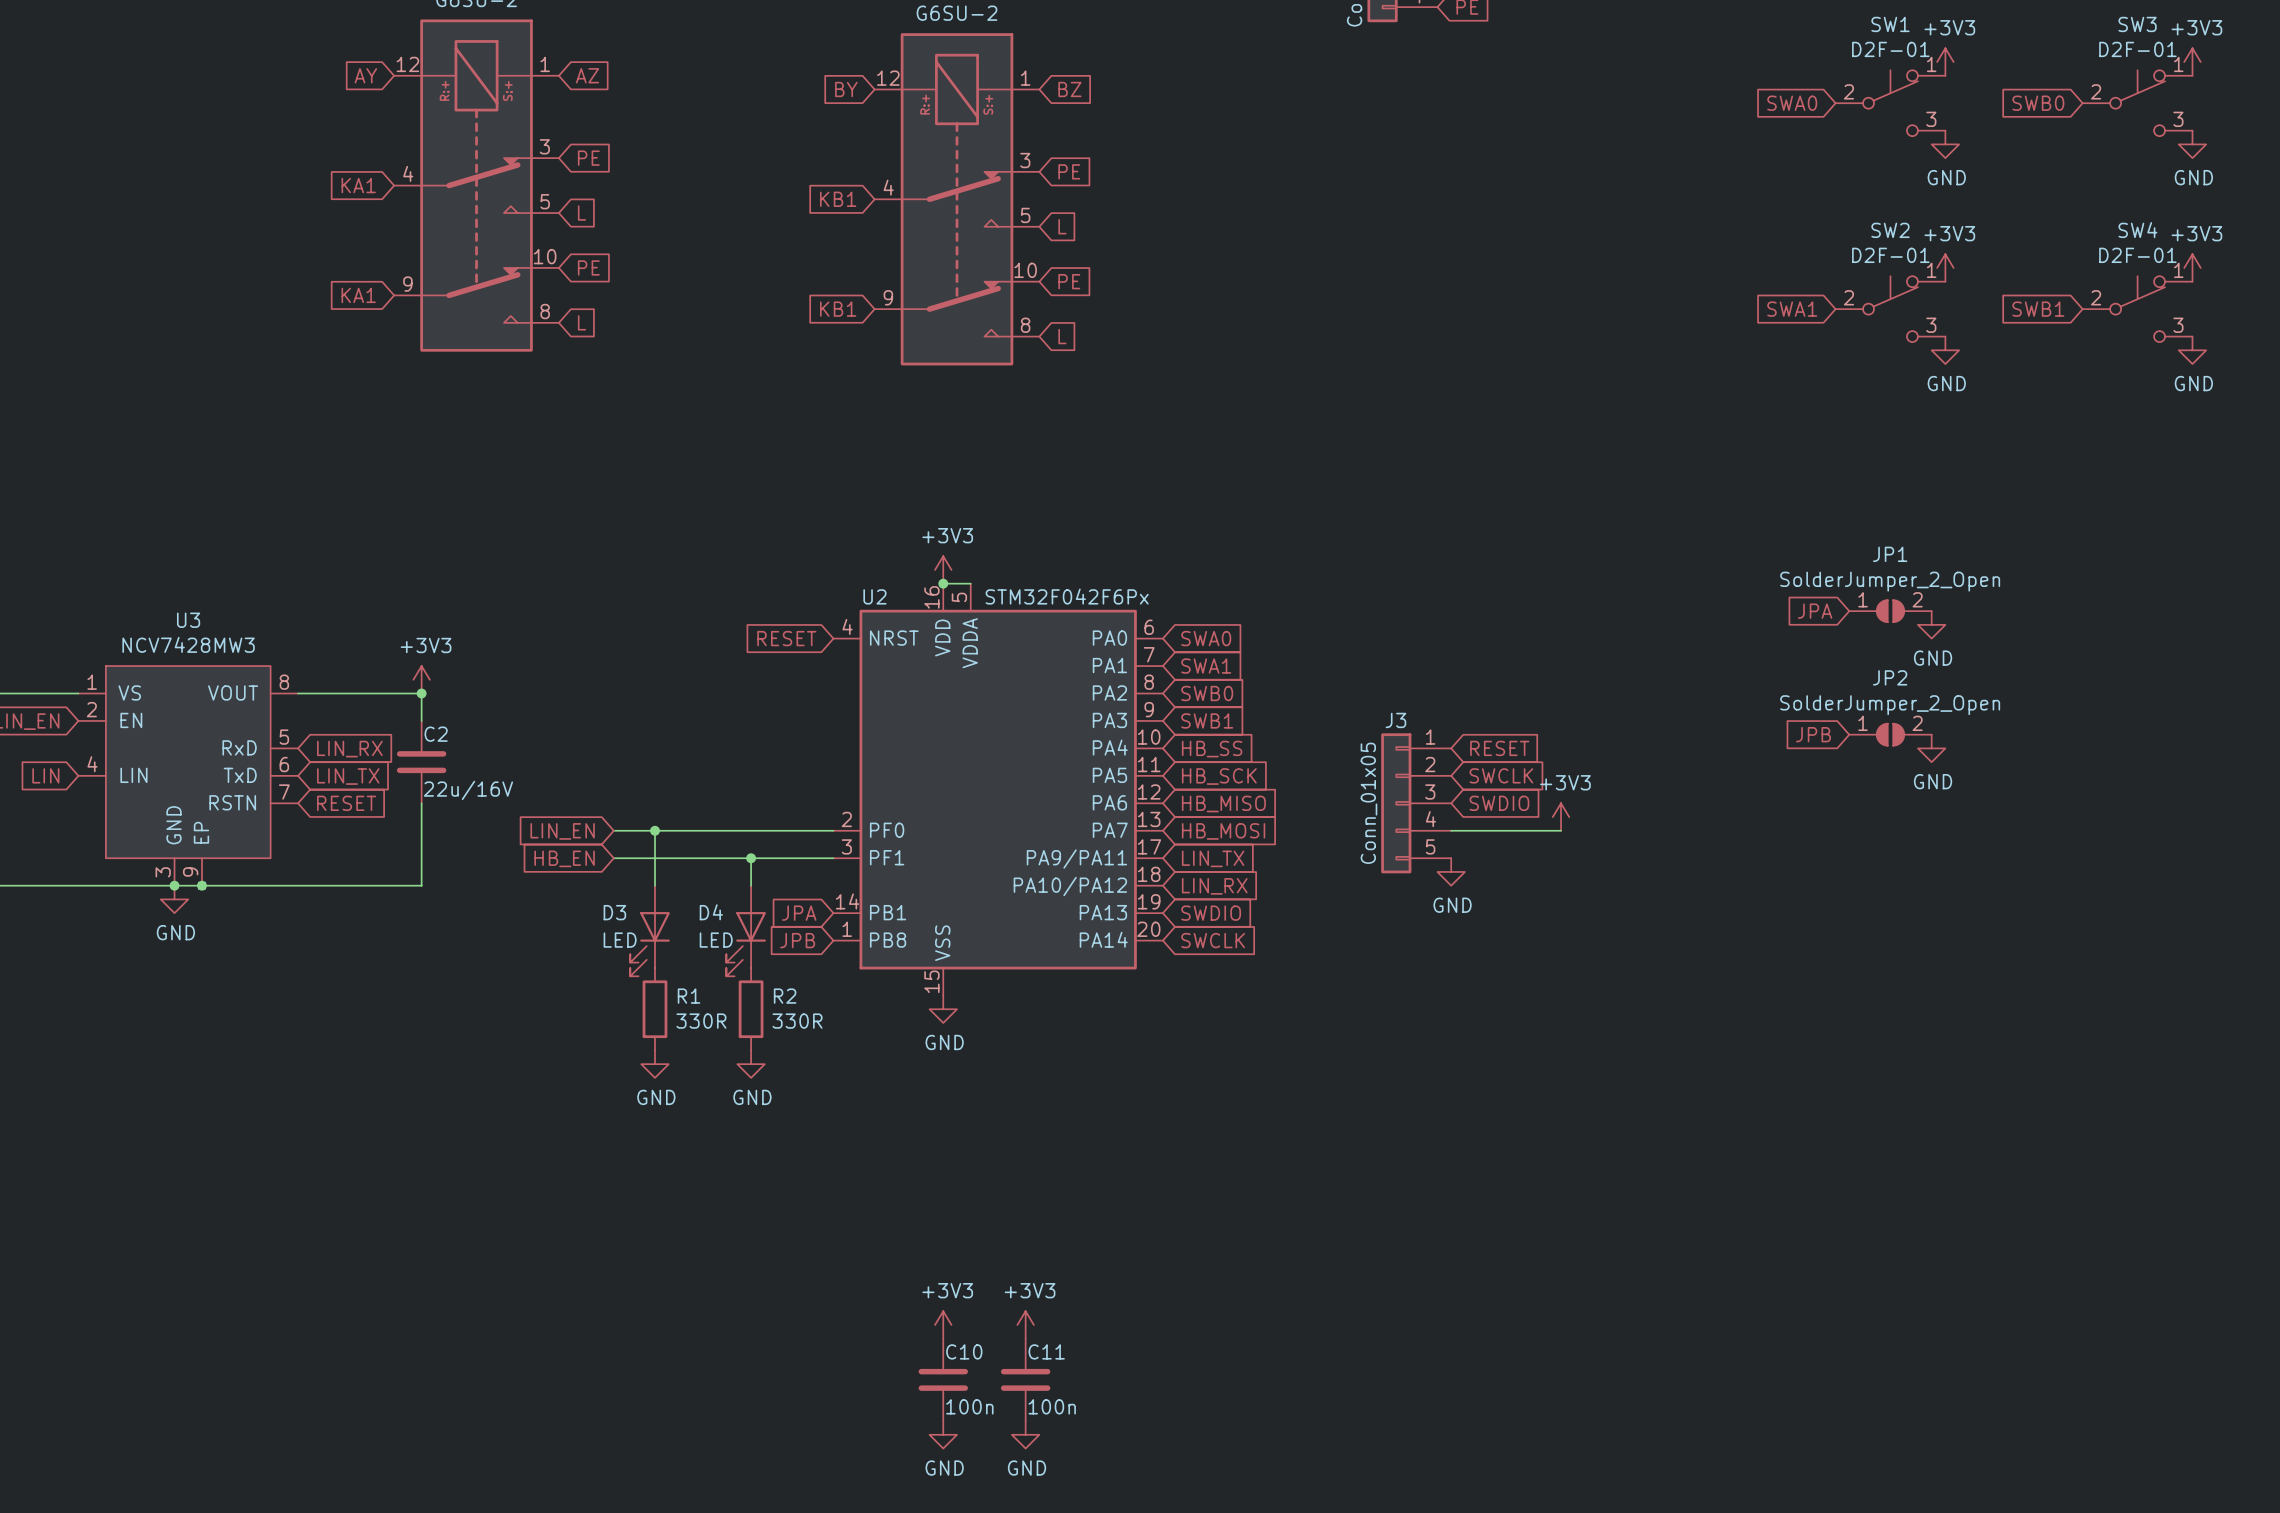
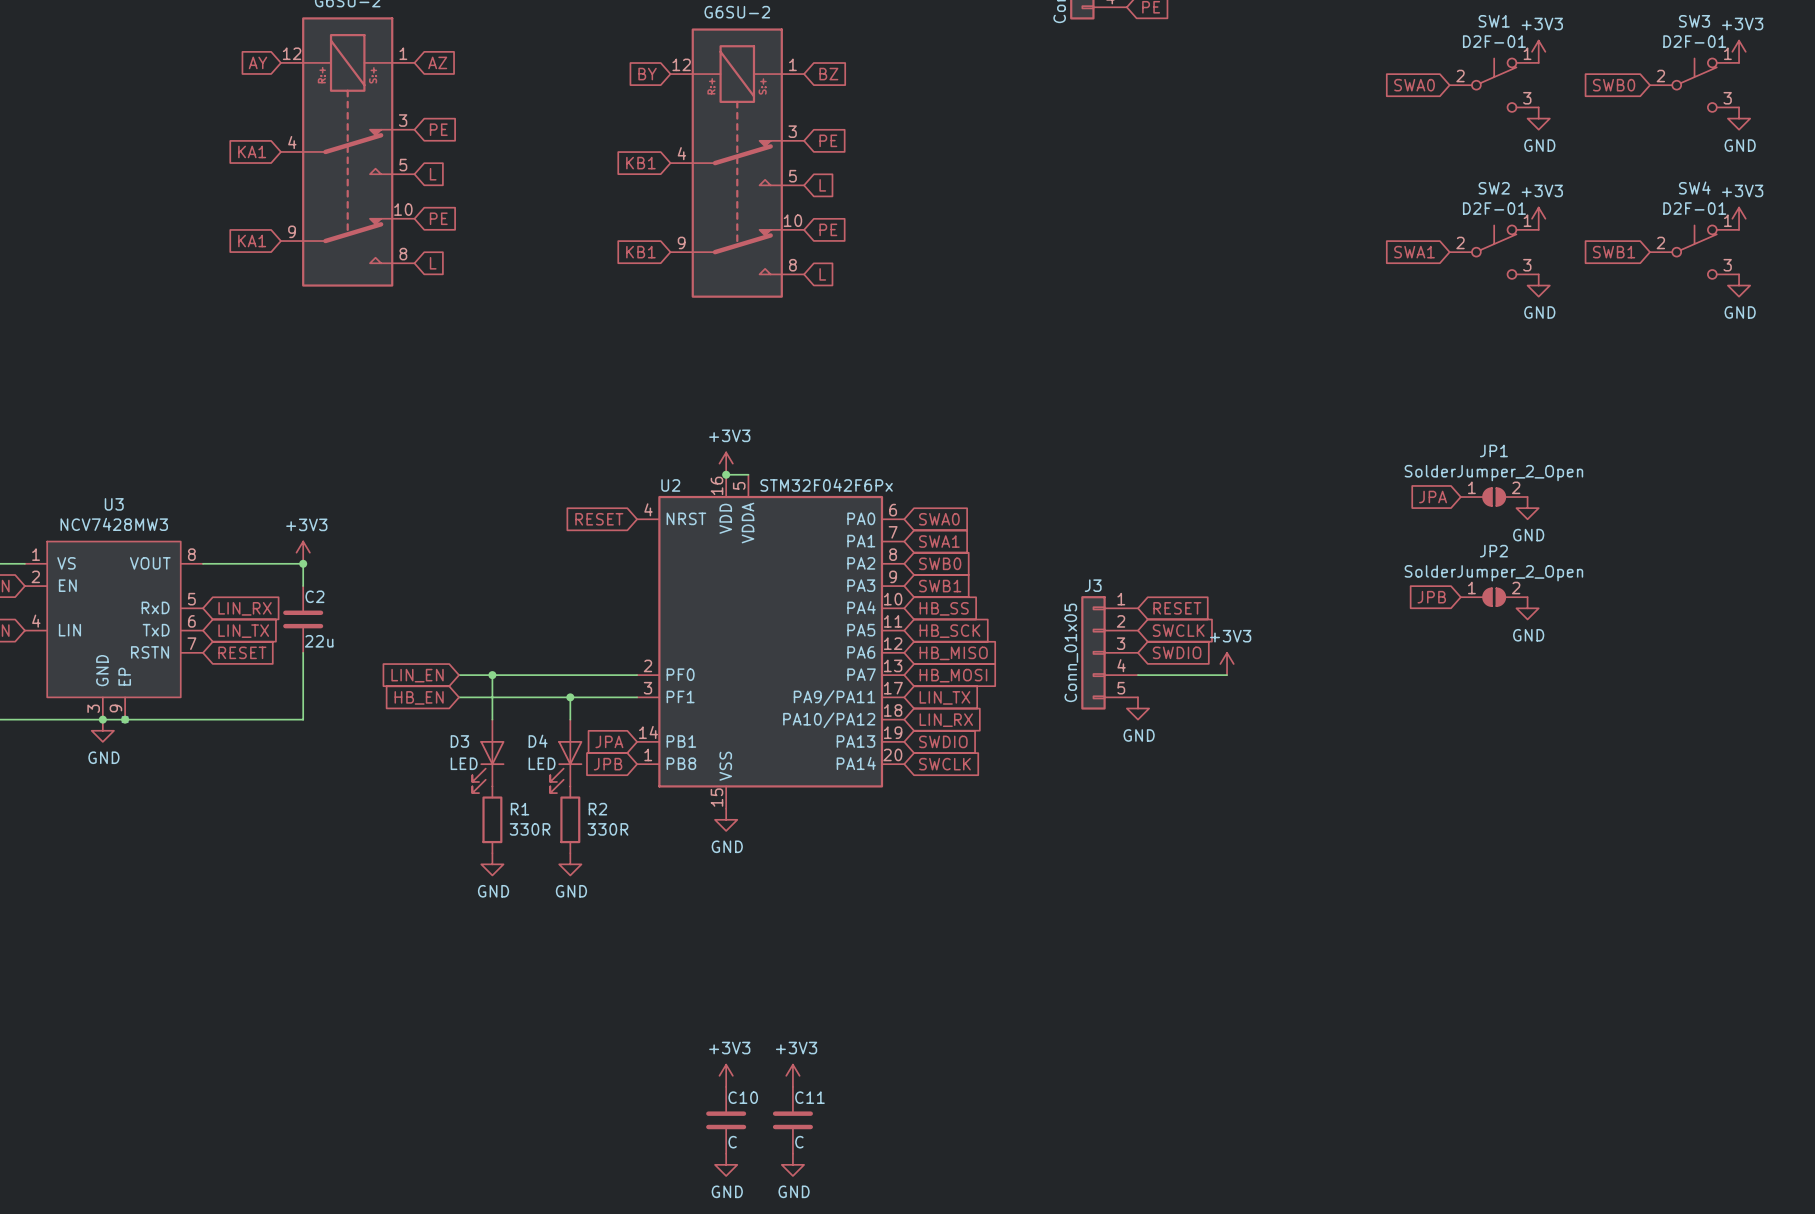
C2 value: 22u/16V (468, 790) -> 22u (319, 641)
C10 value: 100n (969, 1406) -> C (732, 1142)
C11 value: 100n (1052, 1406) -> C (799, 1142)

